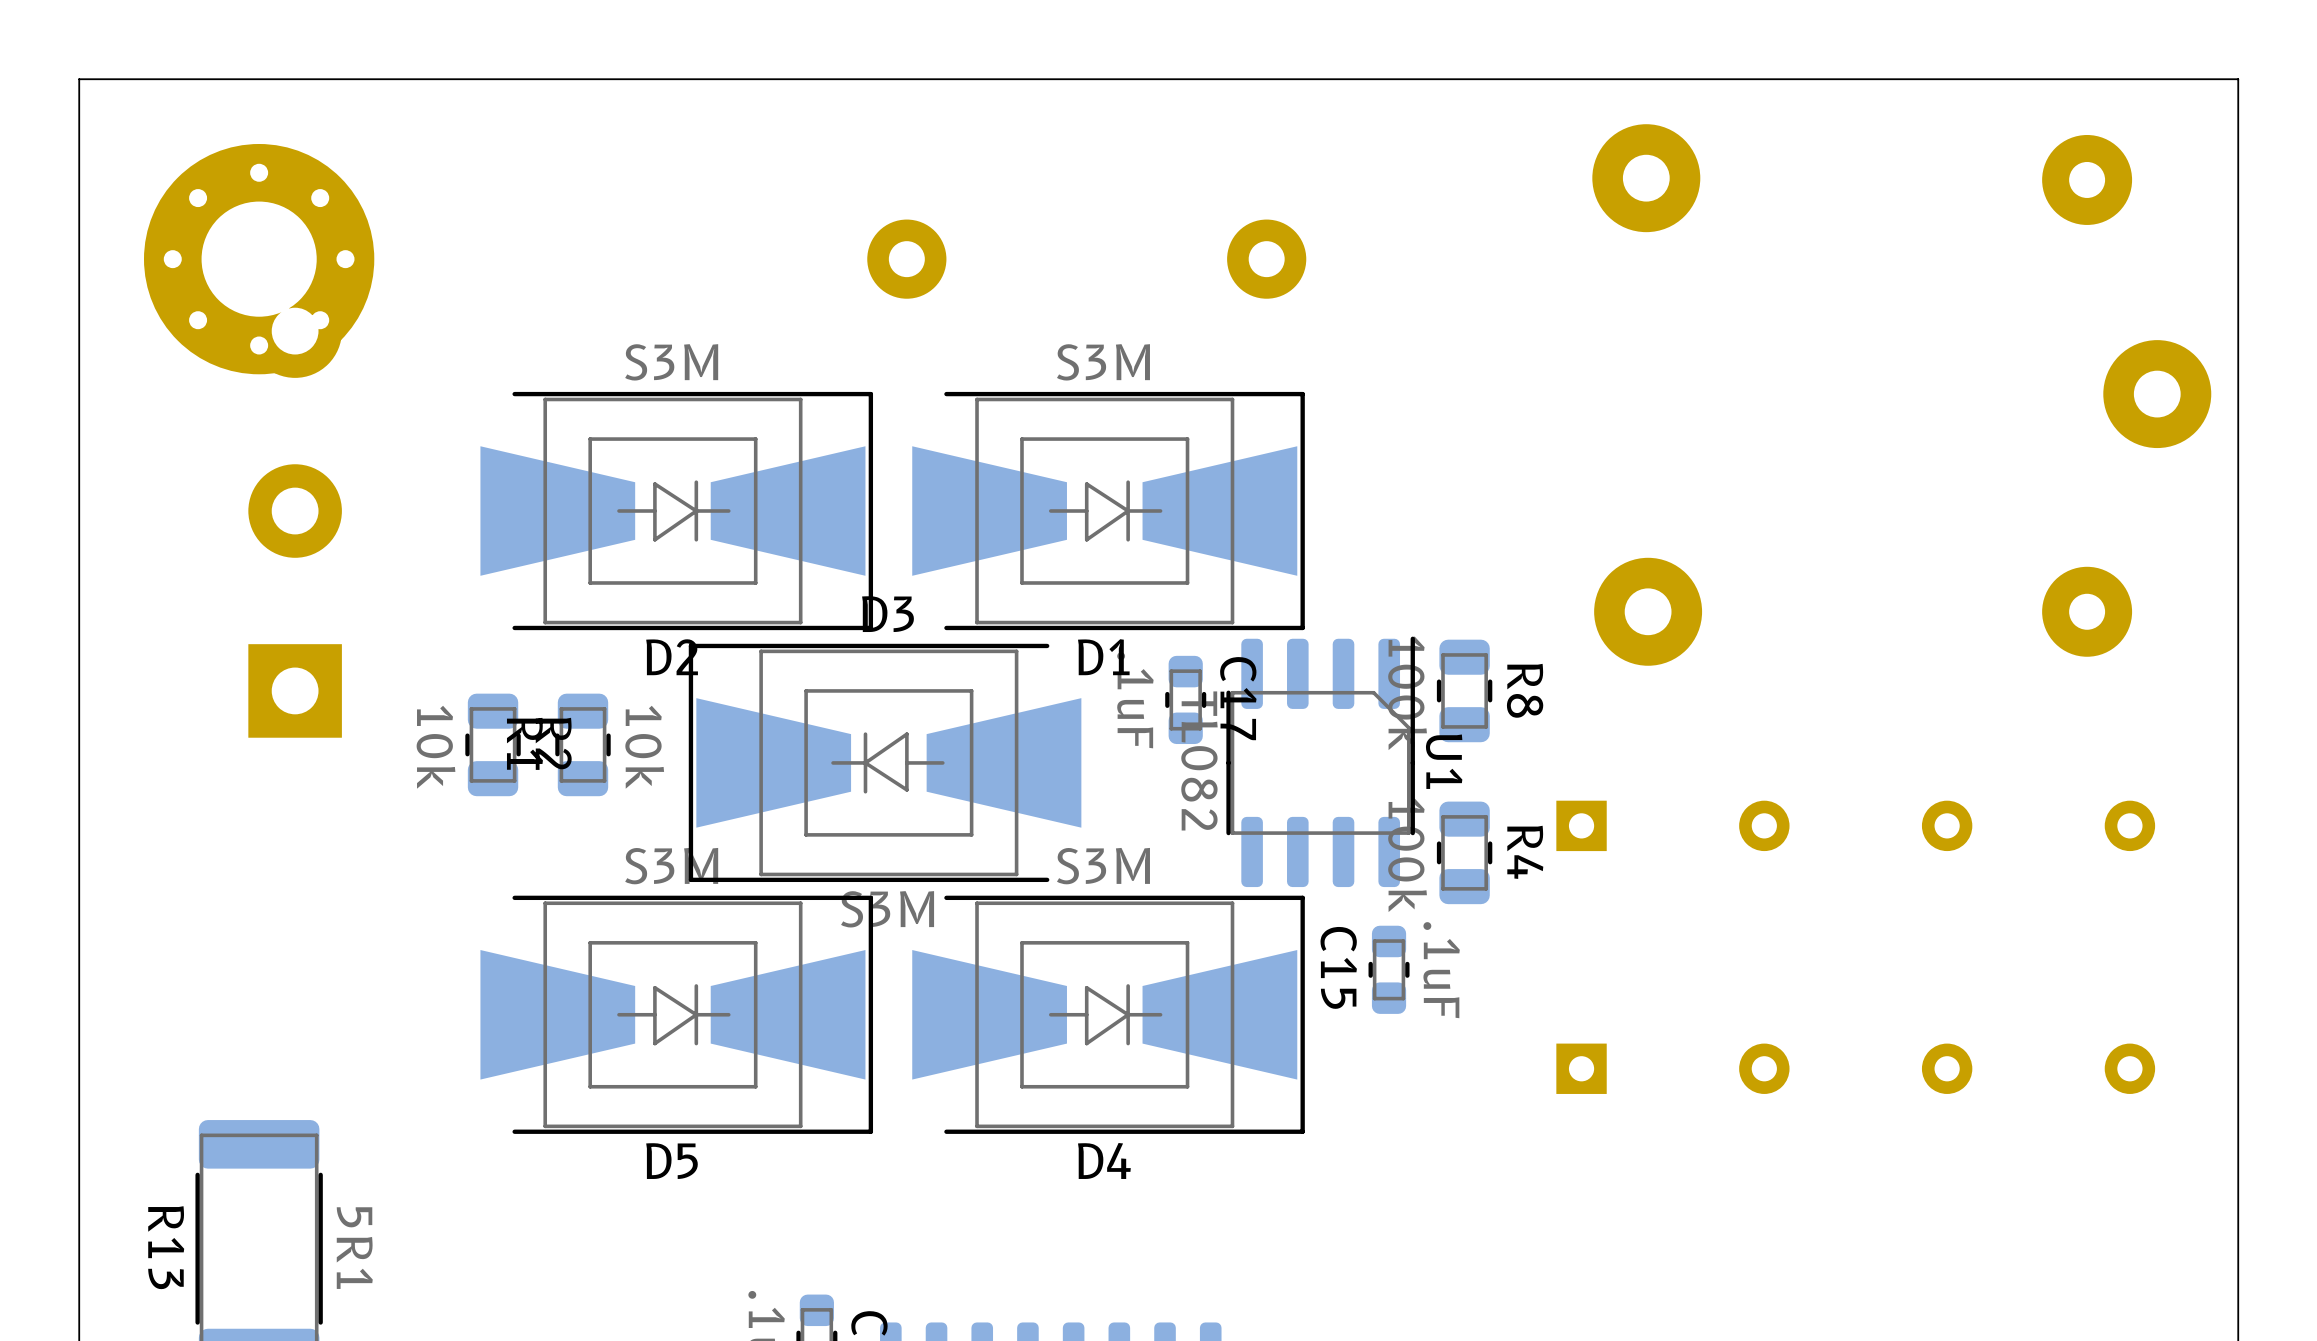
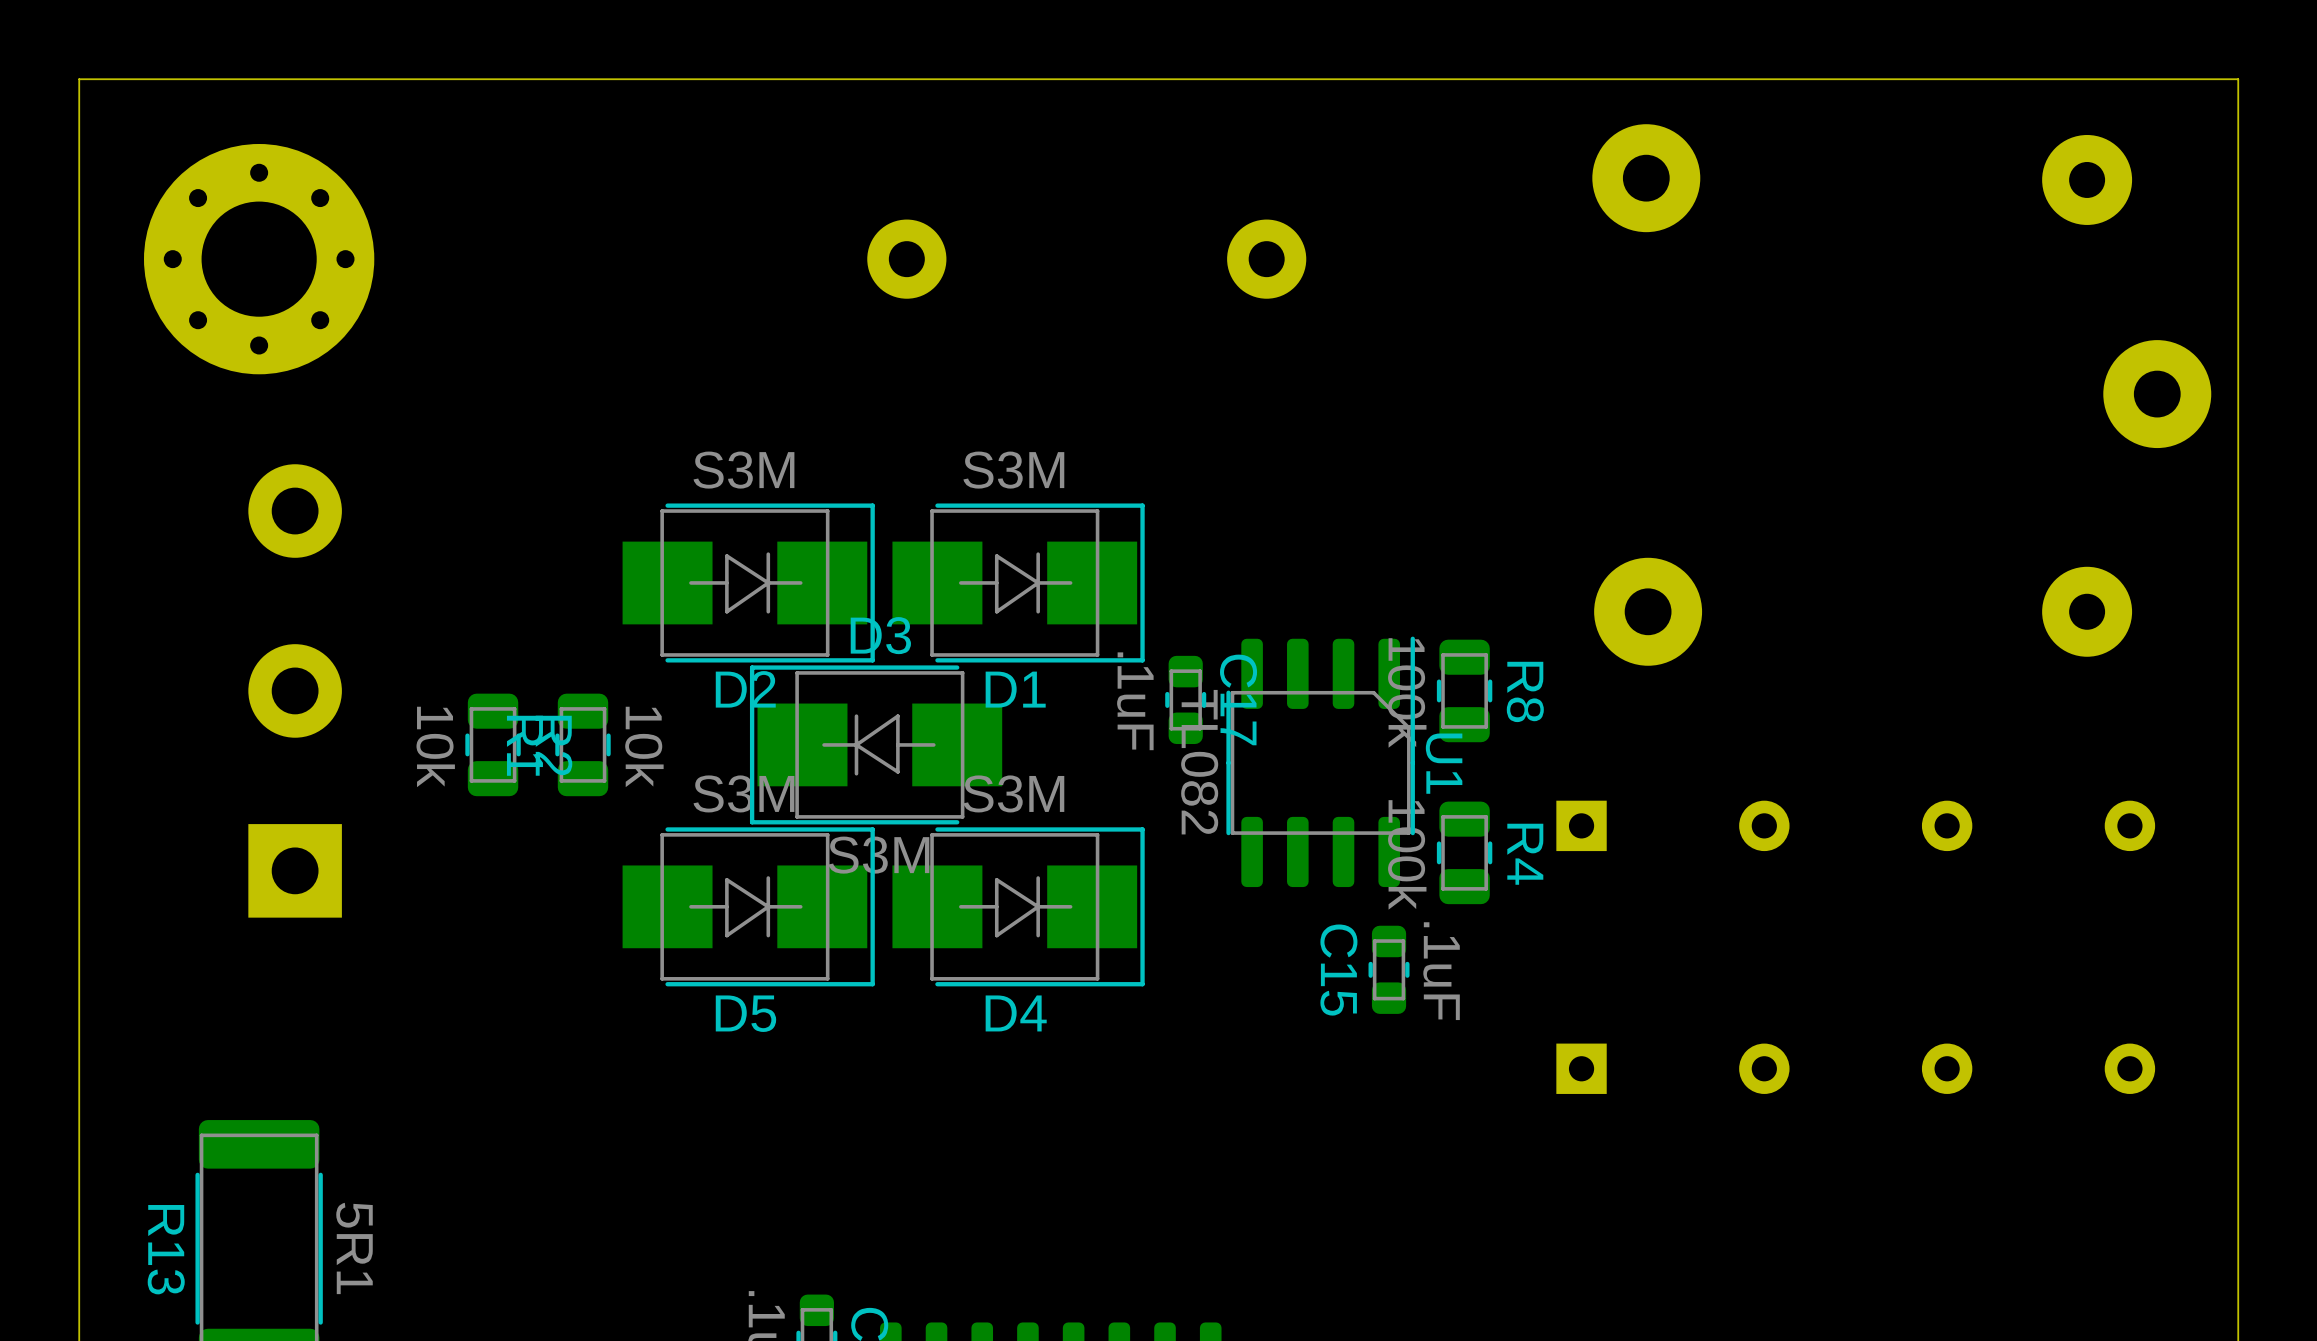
D2 footprint: [480, 391, 874, 631] -> [622, 503, 875, 663]
D1 footprint: [912, 391, 1305, 631] -> [892, 503, 1145, 663]
part position: (295, 511) -> (295, 690)
D3 footprint: [688, 643, 1082, 883] -> [749, 665, 1003, 825]
D5 footprint: [480, 895, 874, 1134] -> [622, 827, 875, 987]
D4 footprint: [912, 895, 1305, 1134] -> [892, 827, 1145, 987]

